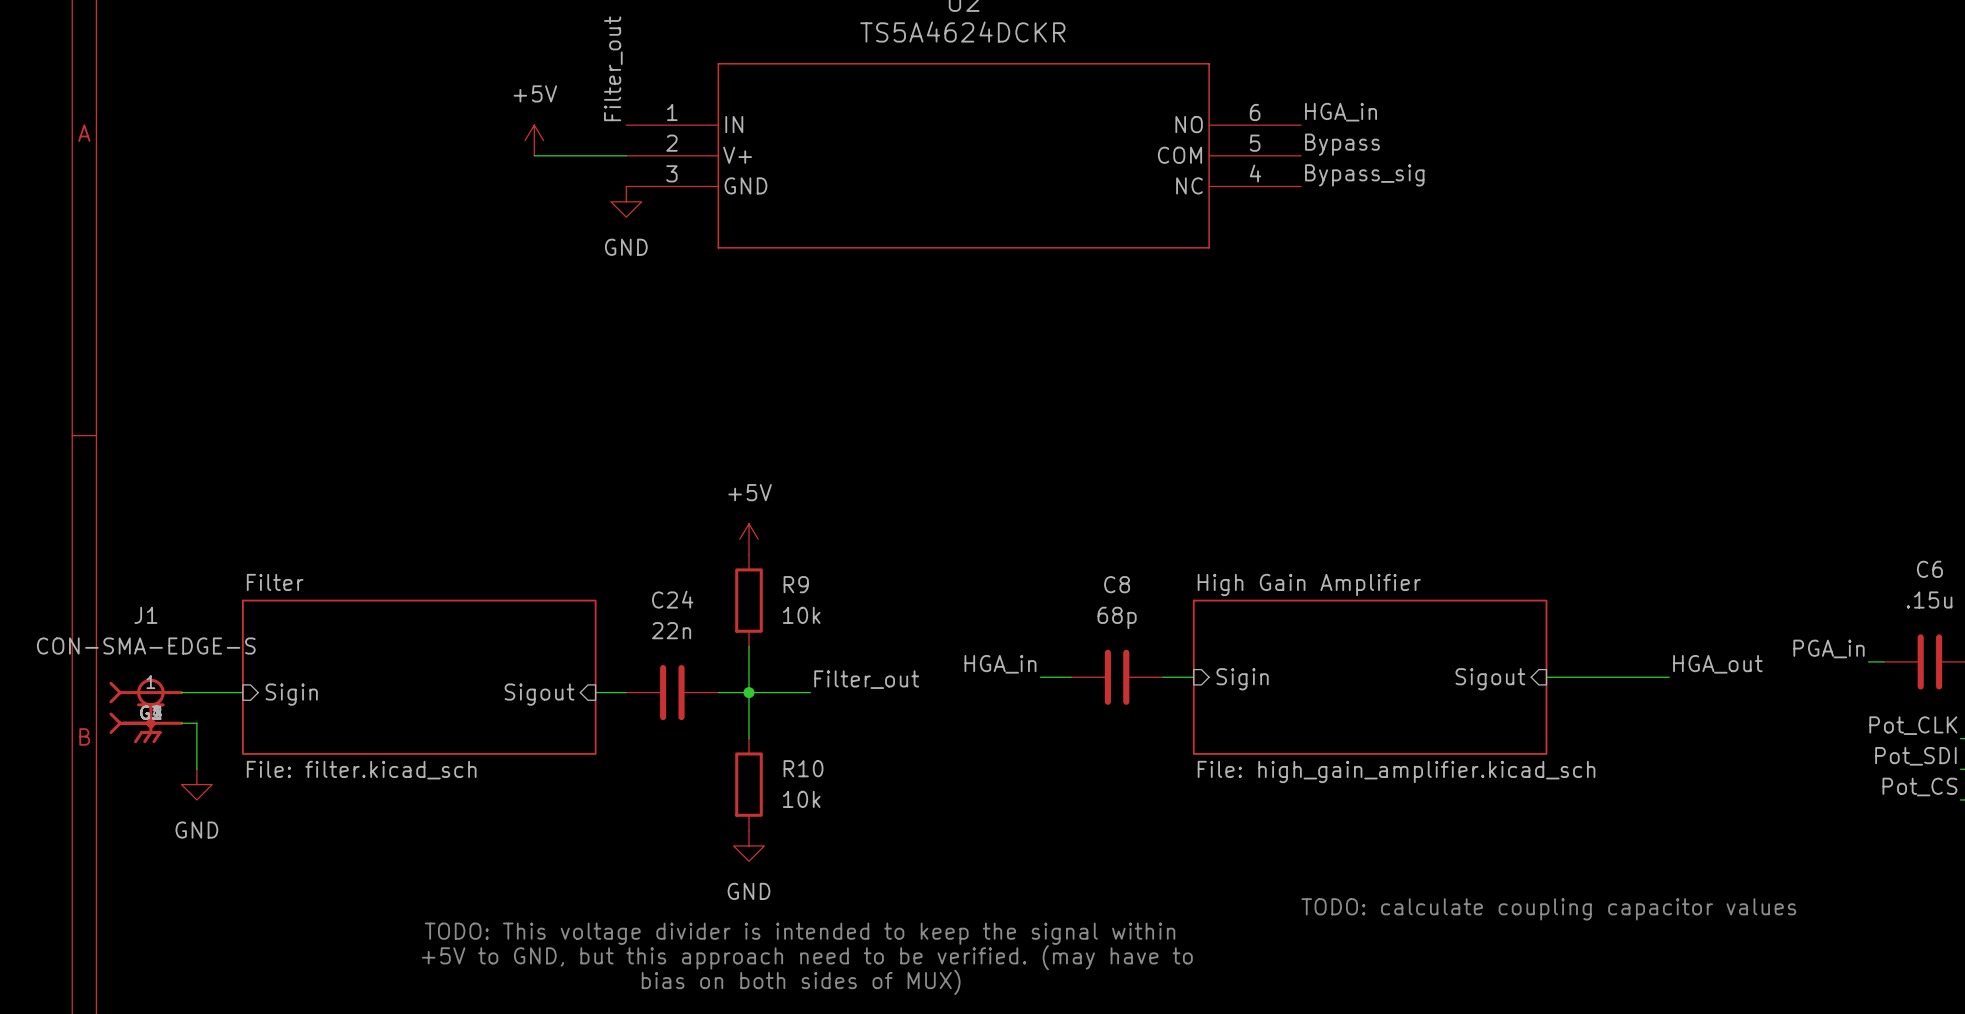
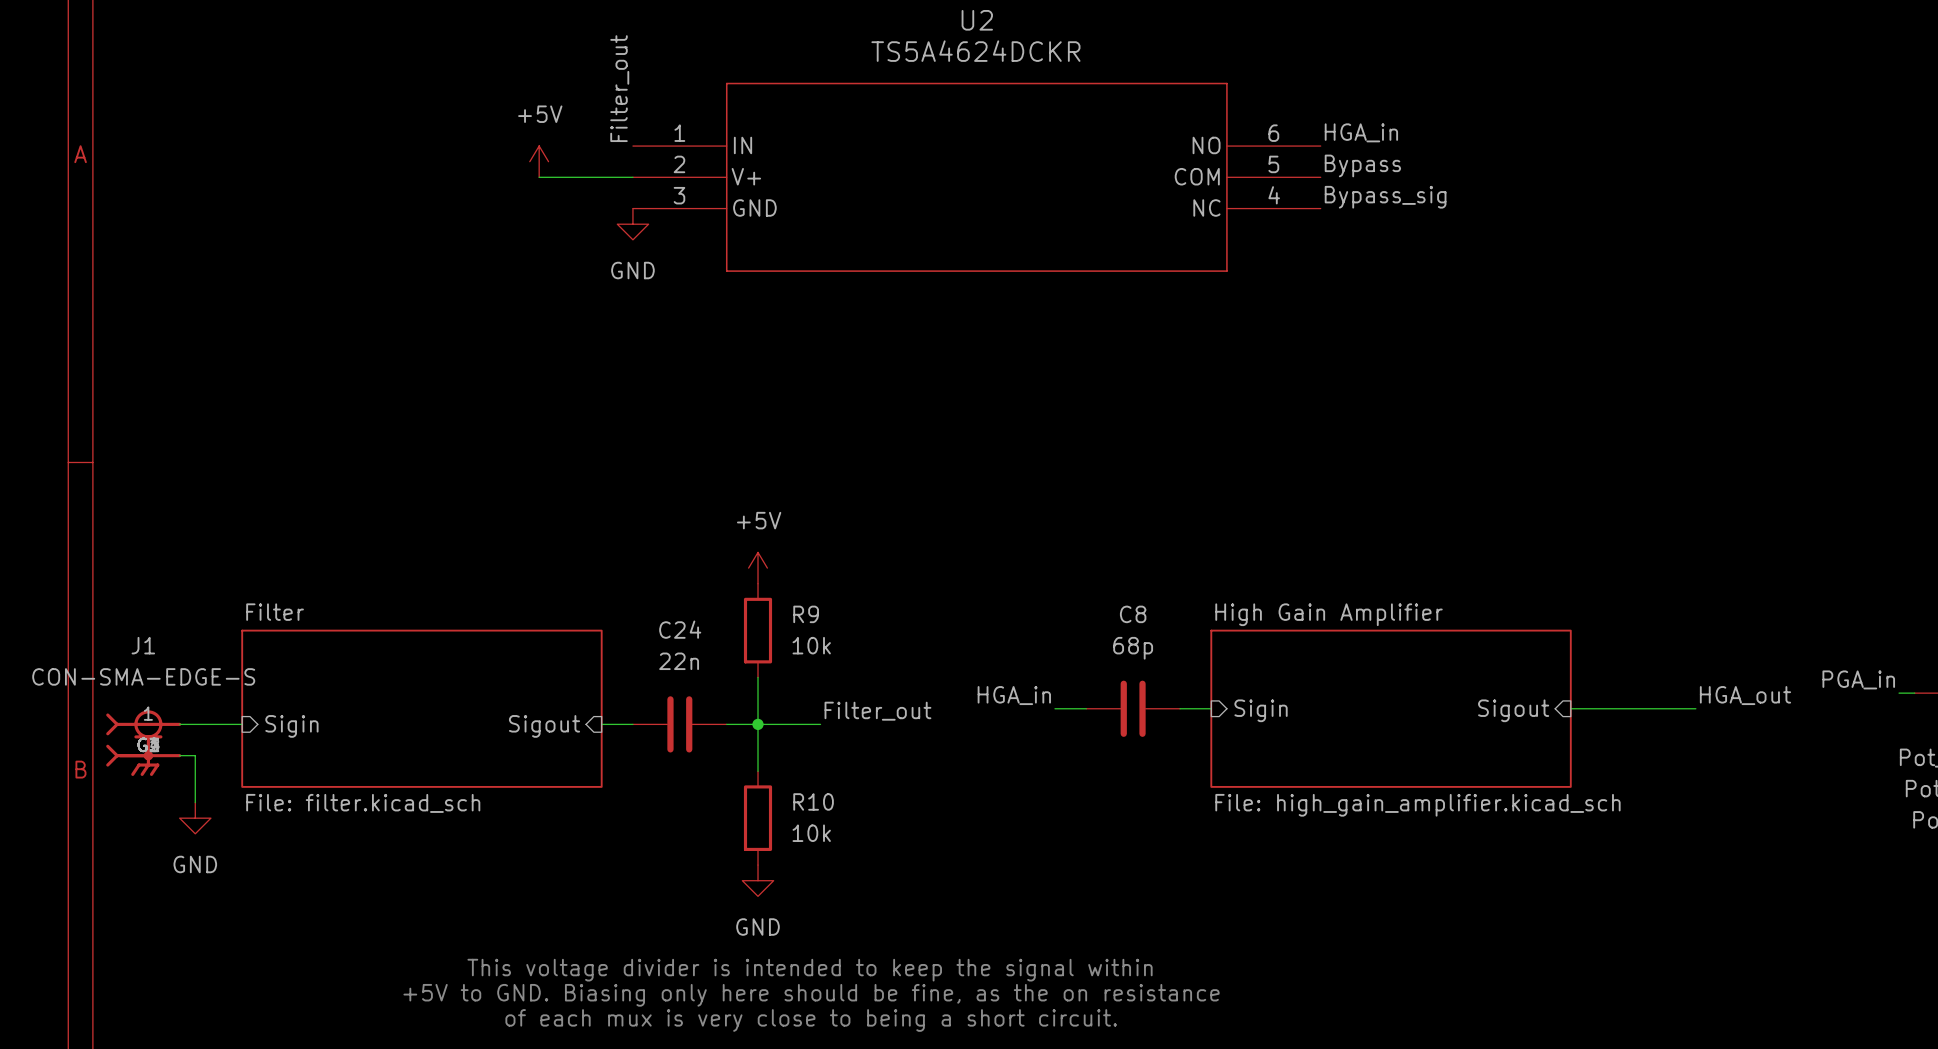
text: TODO: calculate coupling capacitor values (1548, 909) -> none
text: TODO: This voltage divider is intended to keep the signal within (800, 933) -> This voltage divider is intended to keep the signal within (810, 970)
text: +5V to GND, but this approach need to be verified. (may have to (807, 957) -> +5V to GND. Biasing only here should be fine, as the on resistance (811, 995)
text: bias on both sides of MUX) (801, 982) -> of each mux is very close to being a short circuit. (811, 1020)

